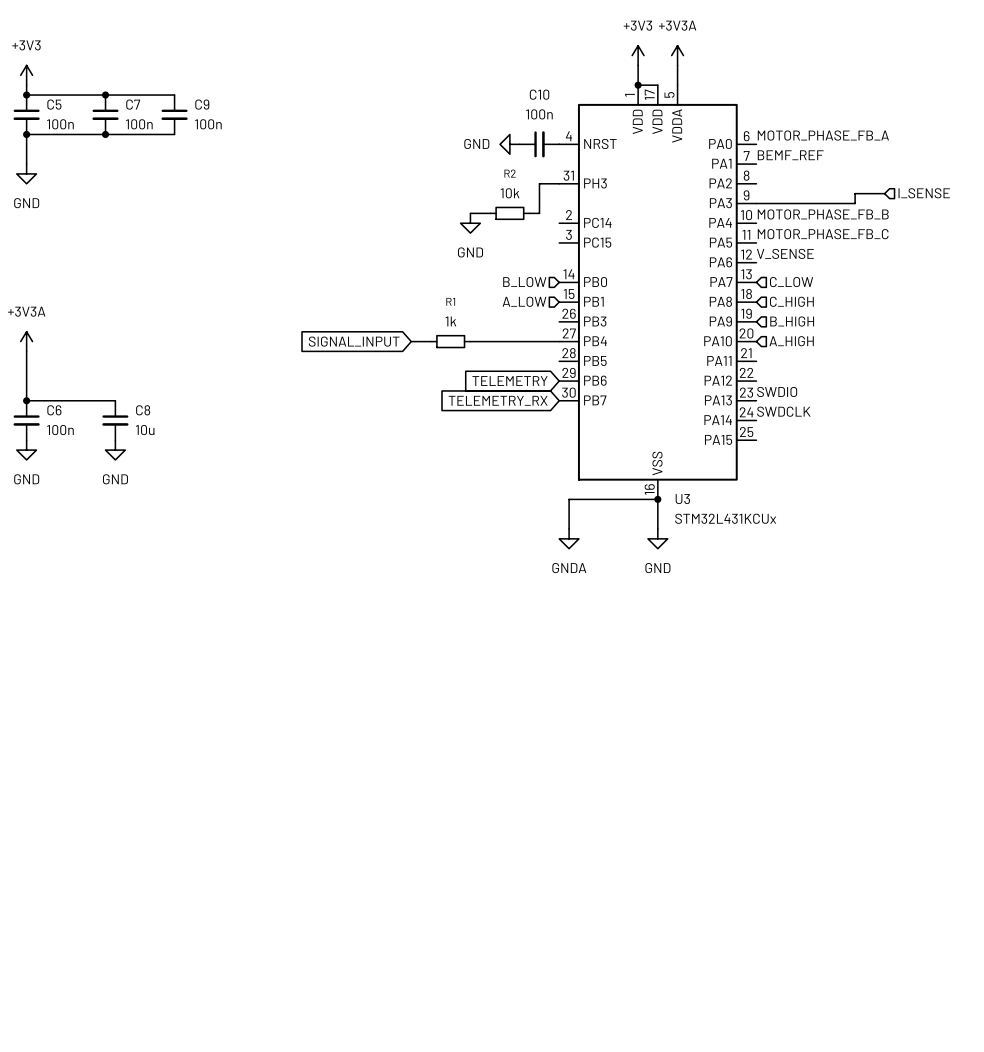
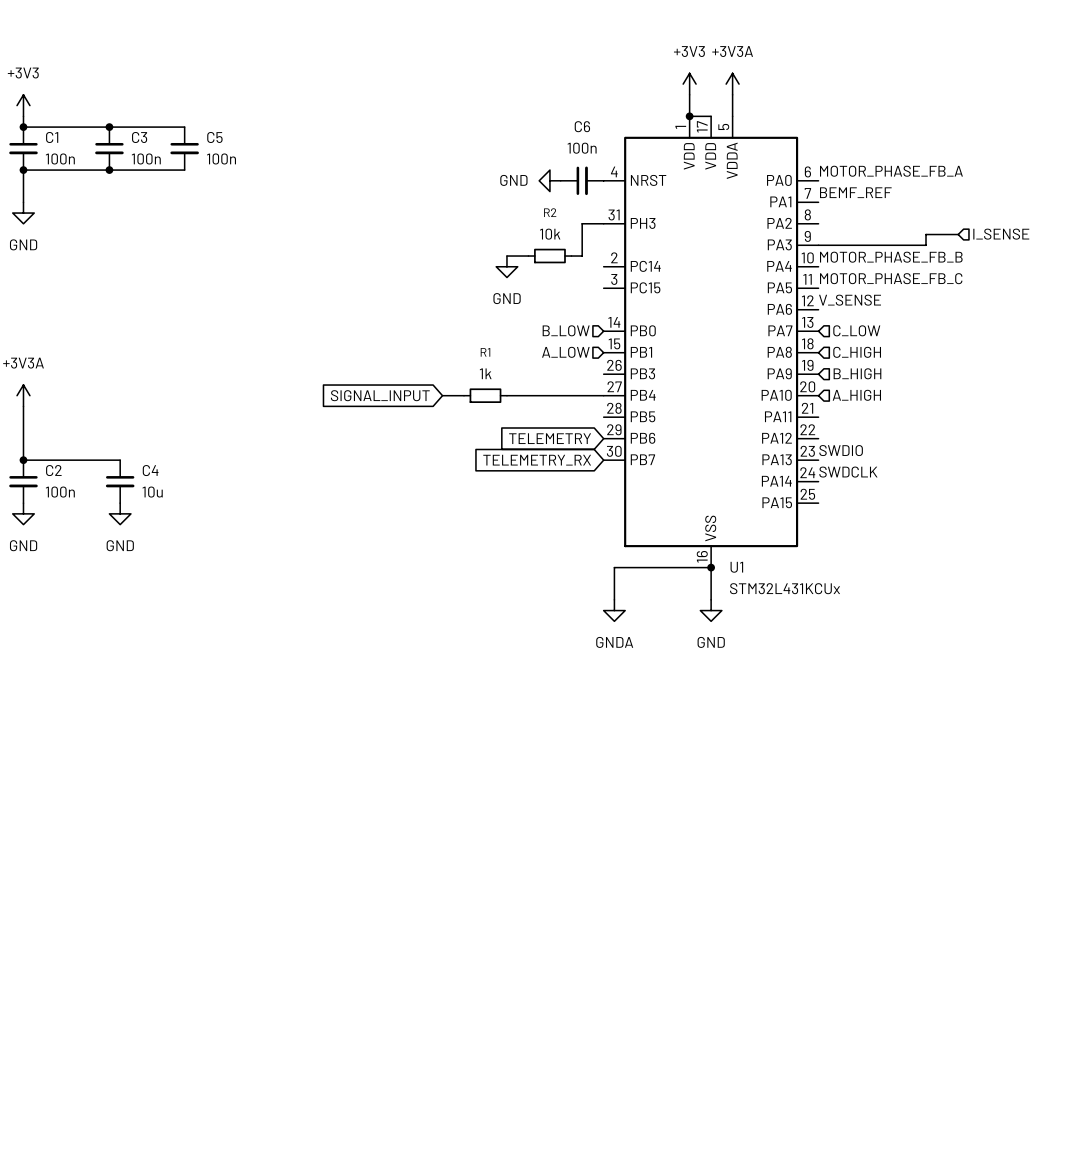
C10 name: C10 (539, 94) -> C6 (582, 126)
C5 name: C5 (54, 104) -> C1 (52, 137)
C7 name: C7 (133, 104) -> C3 (139, 137)
C9 name: C9 (202, 104) -> C5 (214, 137)
C6 name: C6 (54, 410) -> C2 (53, 470)
C8 name: C8 (143, 410) -> C4 (150, 470)
U3 name: U3 (682, 499) -> U1 (736, 567)

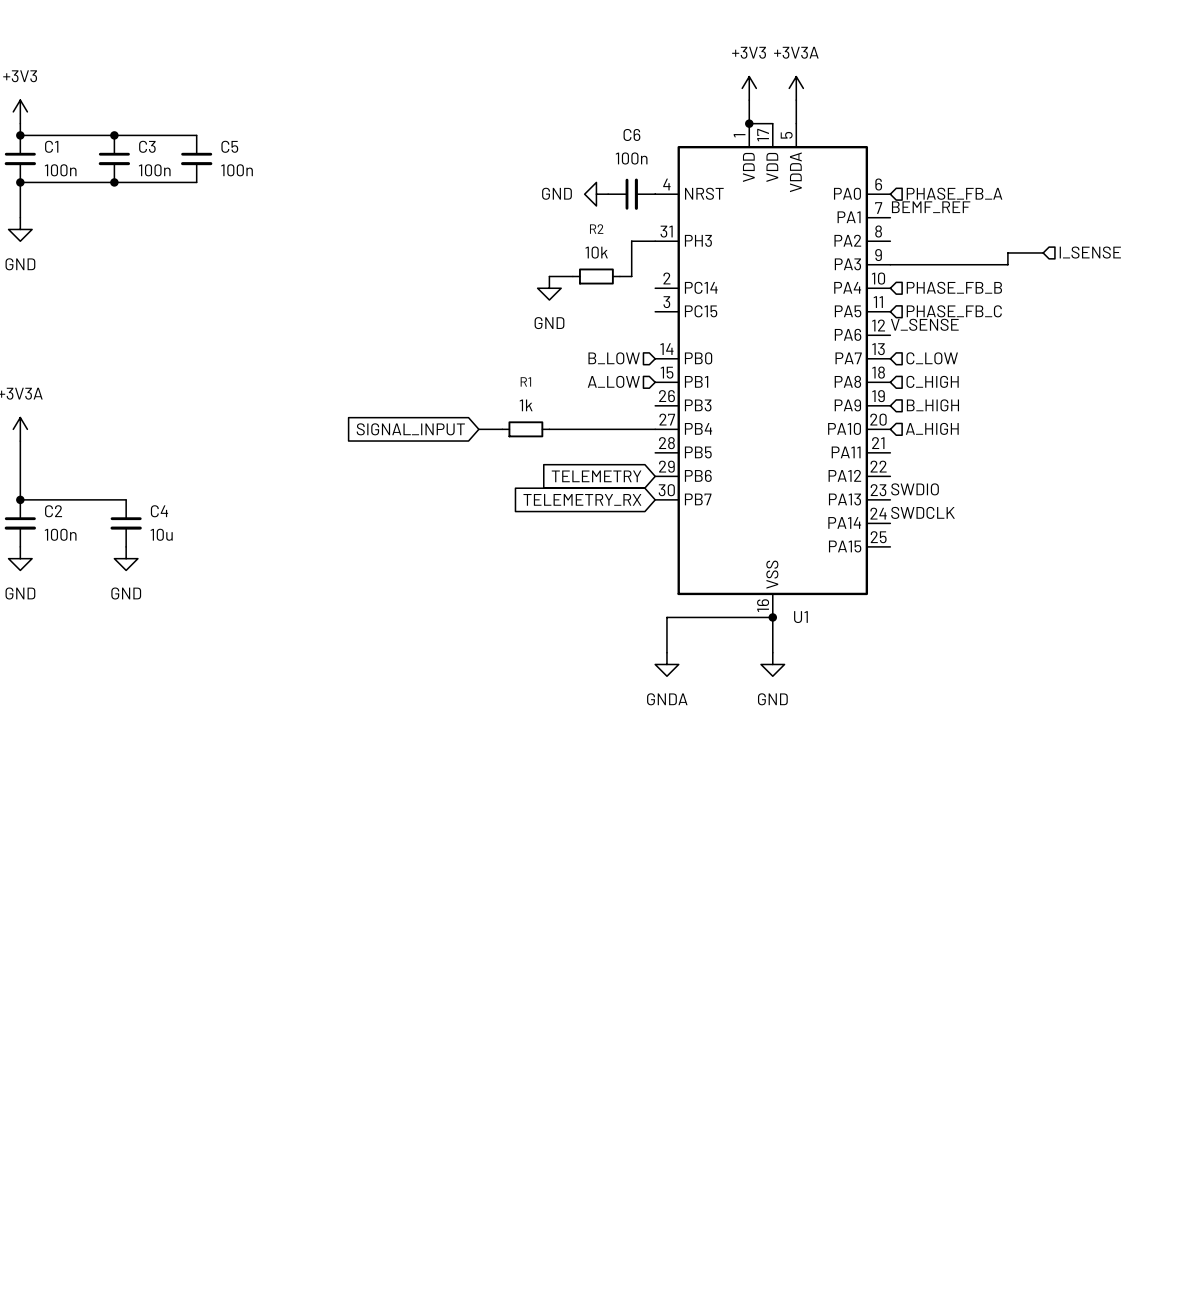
label: MOTOR_PHASE_FB_A (891, 171) -> none
hierarchical label: none -> PHASE_FB_A (954, 193)
label: MOTOR_PHASE_FB_B (891, 257) -> none
hierarchical label: none -> PHASE_FB_B (954, 287)
label: MOTOR_PHASE_FB_C (891, 278) -> none
hierarchical label: none -> PHASE_FB_C (954, 311)
U1 value: STM32L431KCUx (785, 588) -> none

